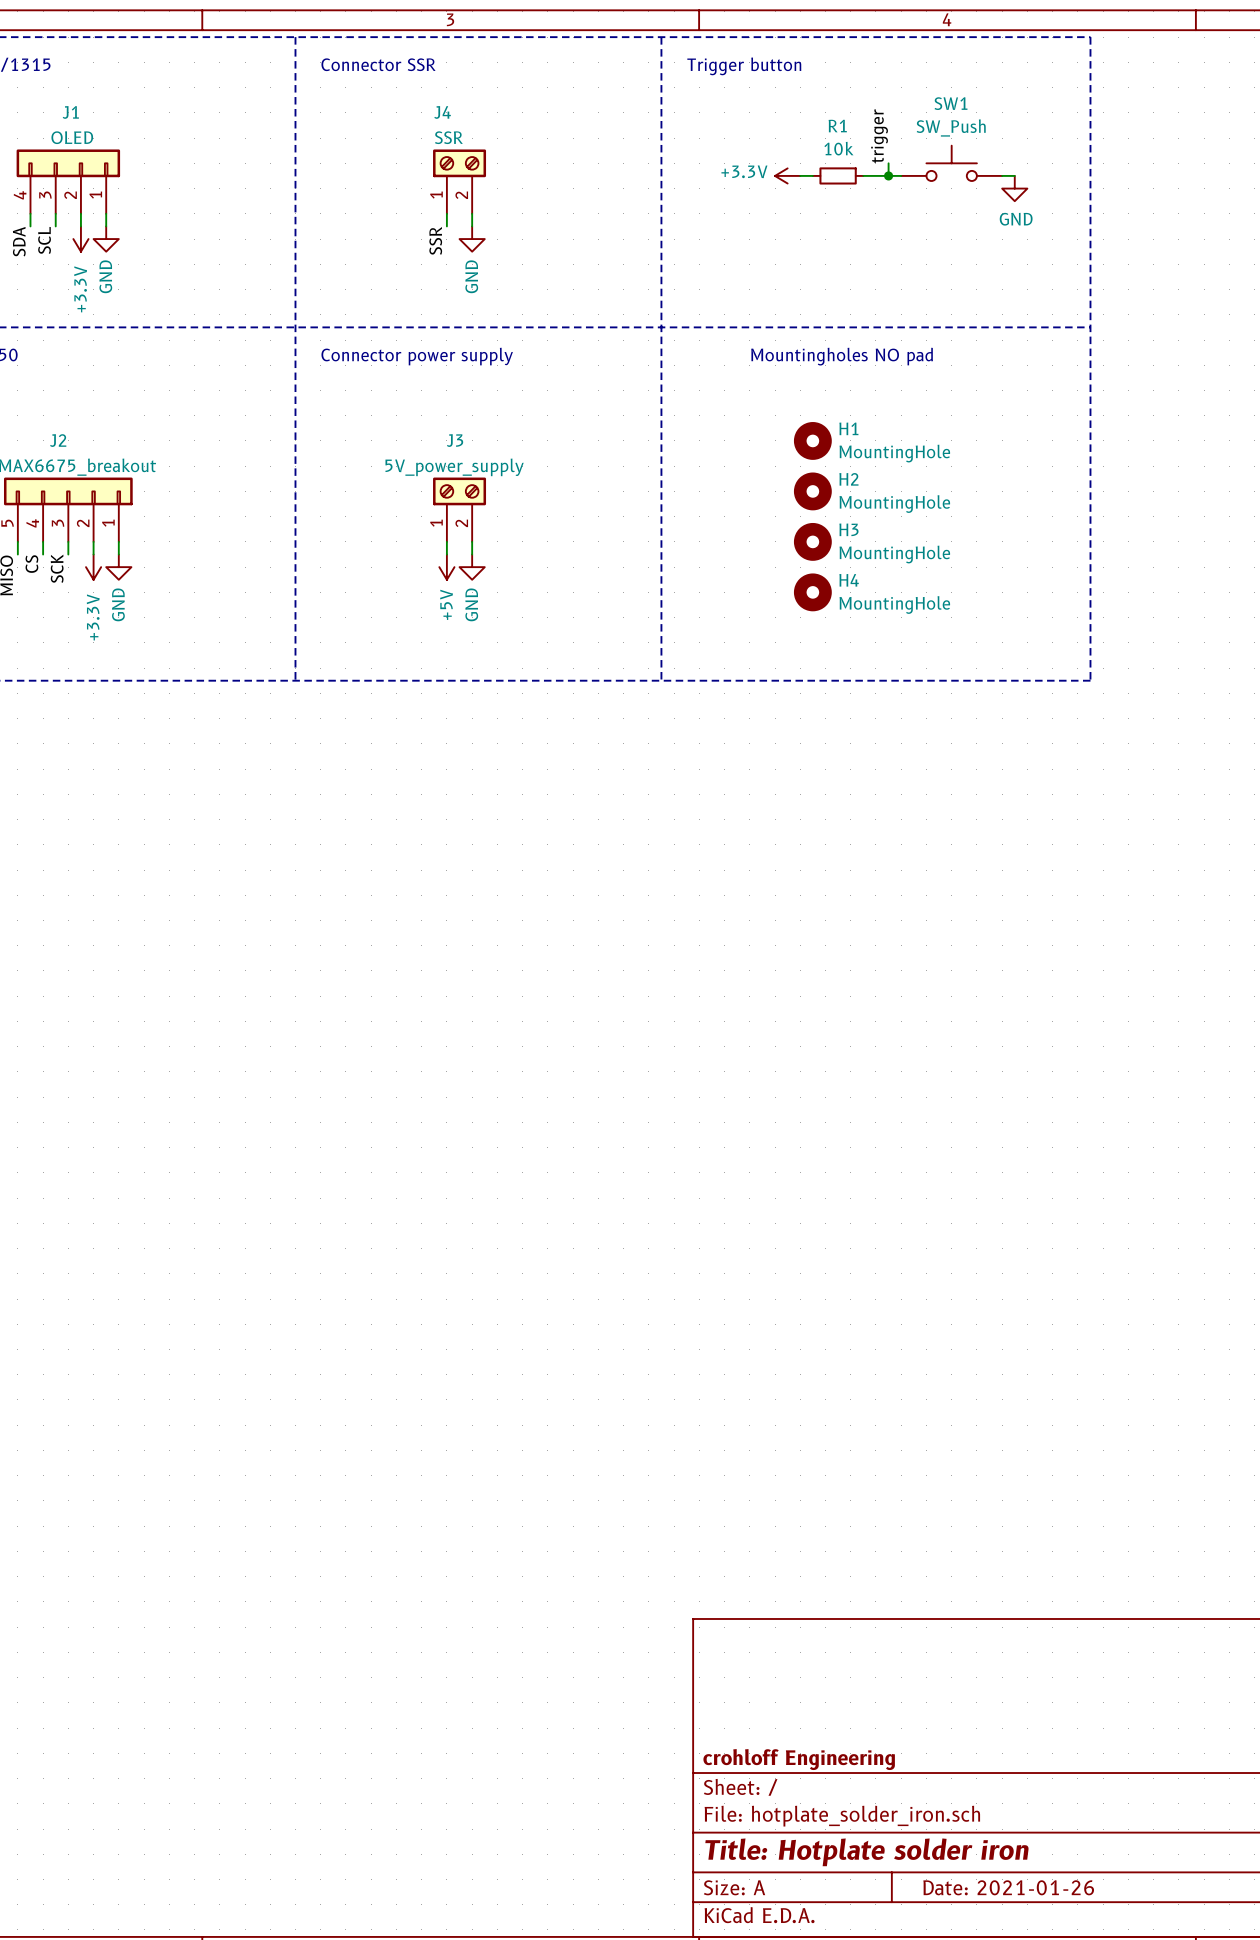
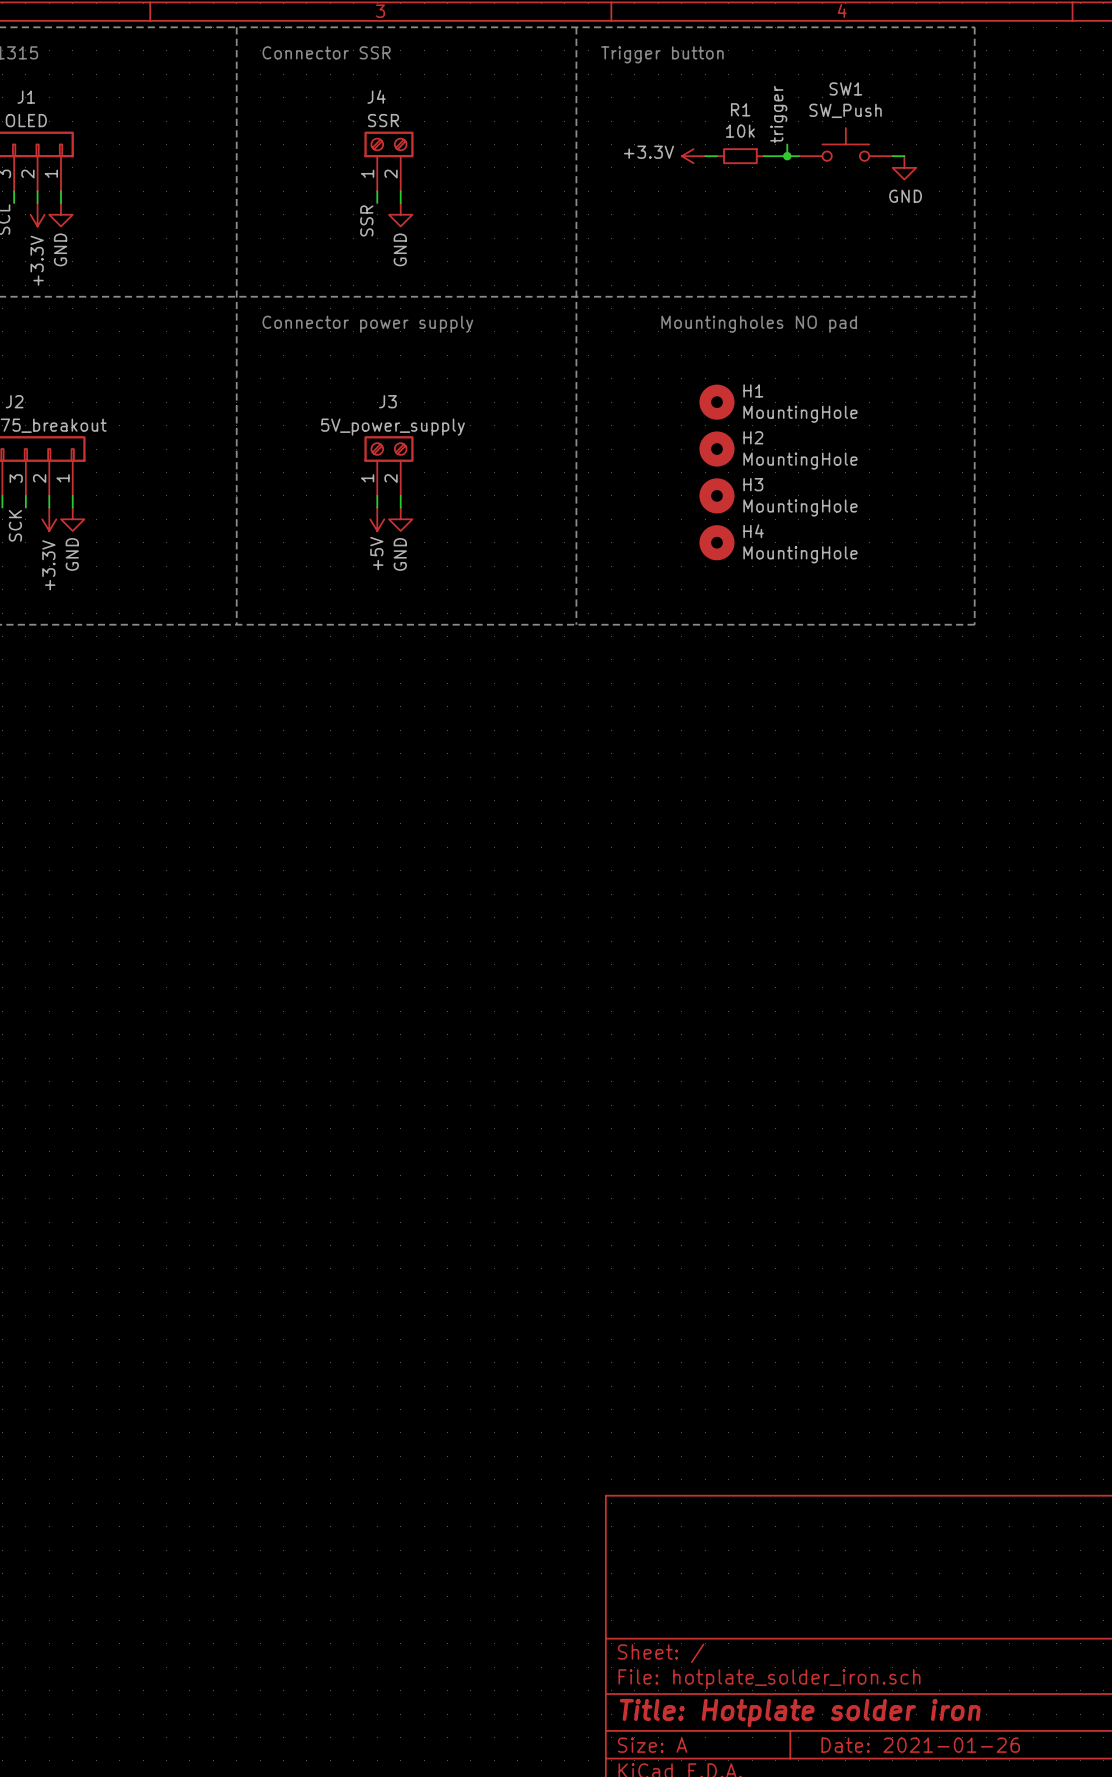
title block: crohloff Engineering (799, 1759) -> none

